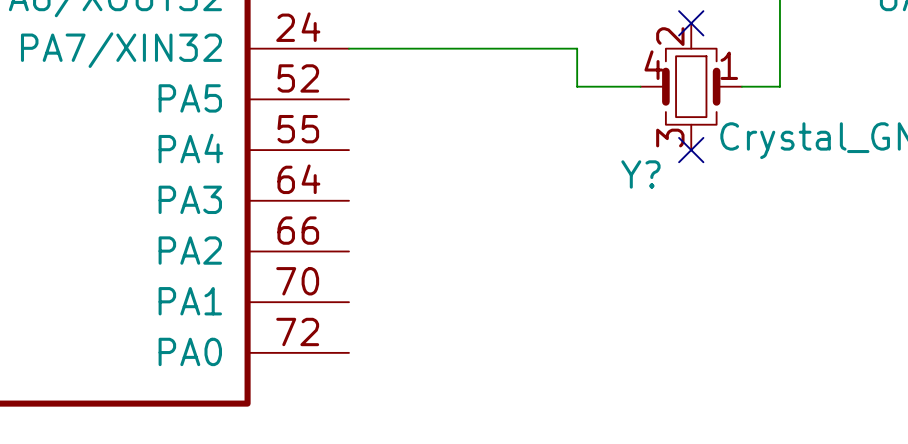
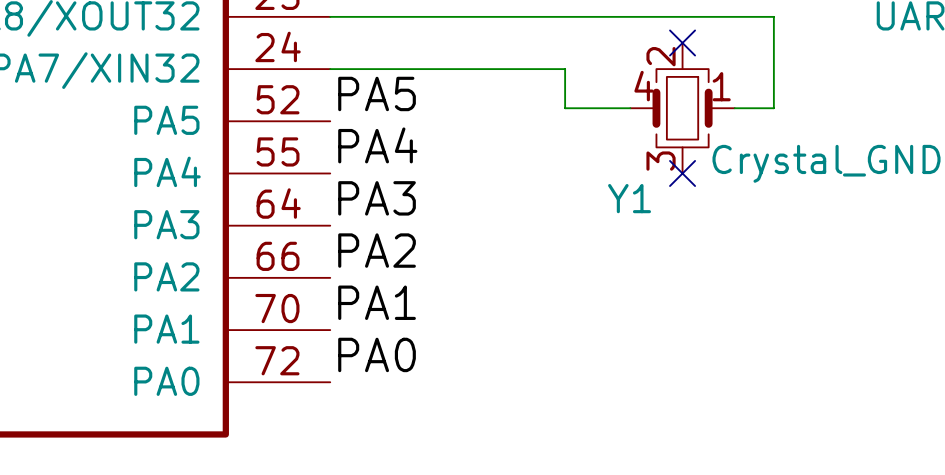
label: none -> PA5 (377, 93)
label: none -> PA4 (377, 145)
label: none -> PA3 (377, 198)
Y? name: Y? (640, 174) -> Y1 (629, 198)
label: none -> PA2 (377, 250)
label: none -> PA1 (377, 302)
label: none -> PA0 (377, 354)

